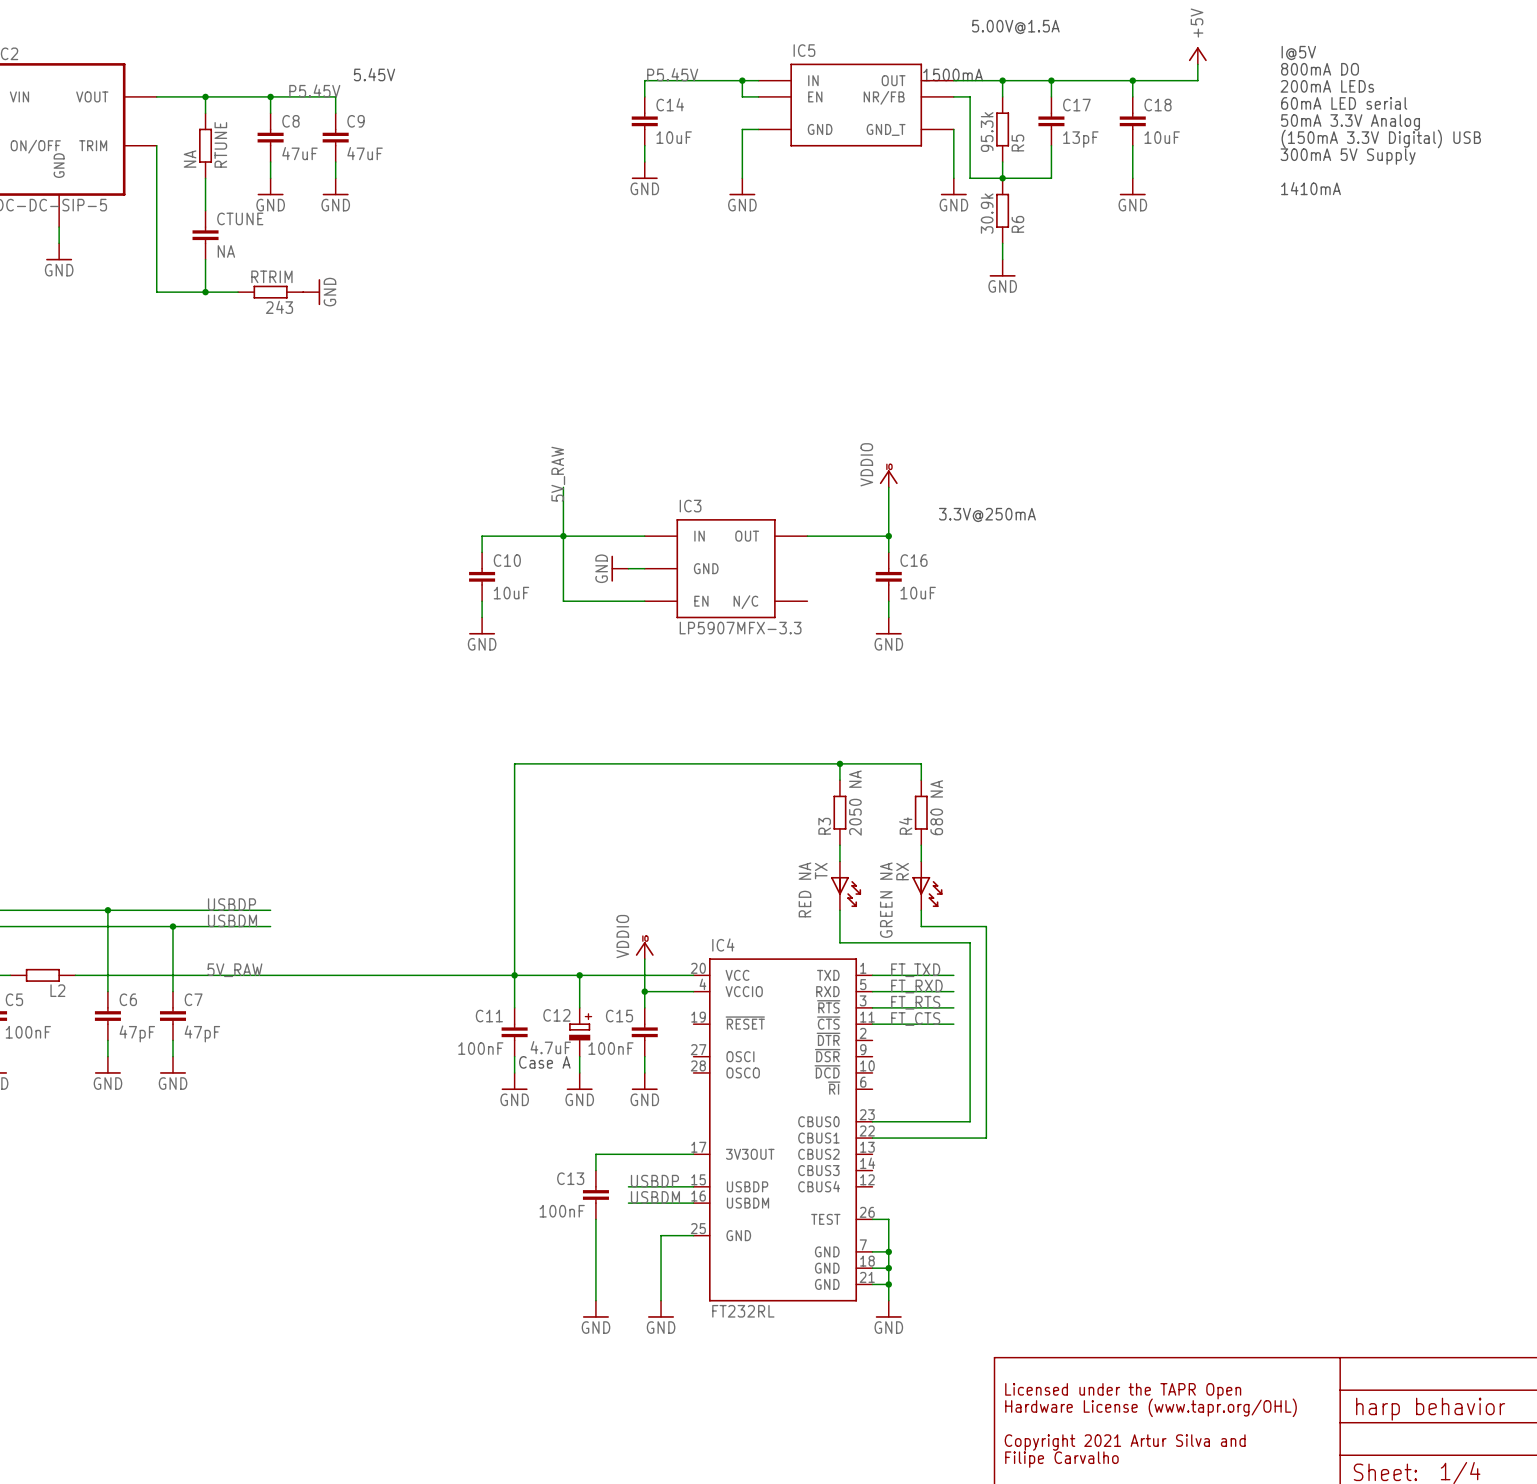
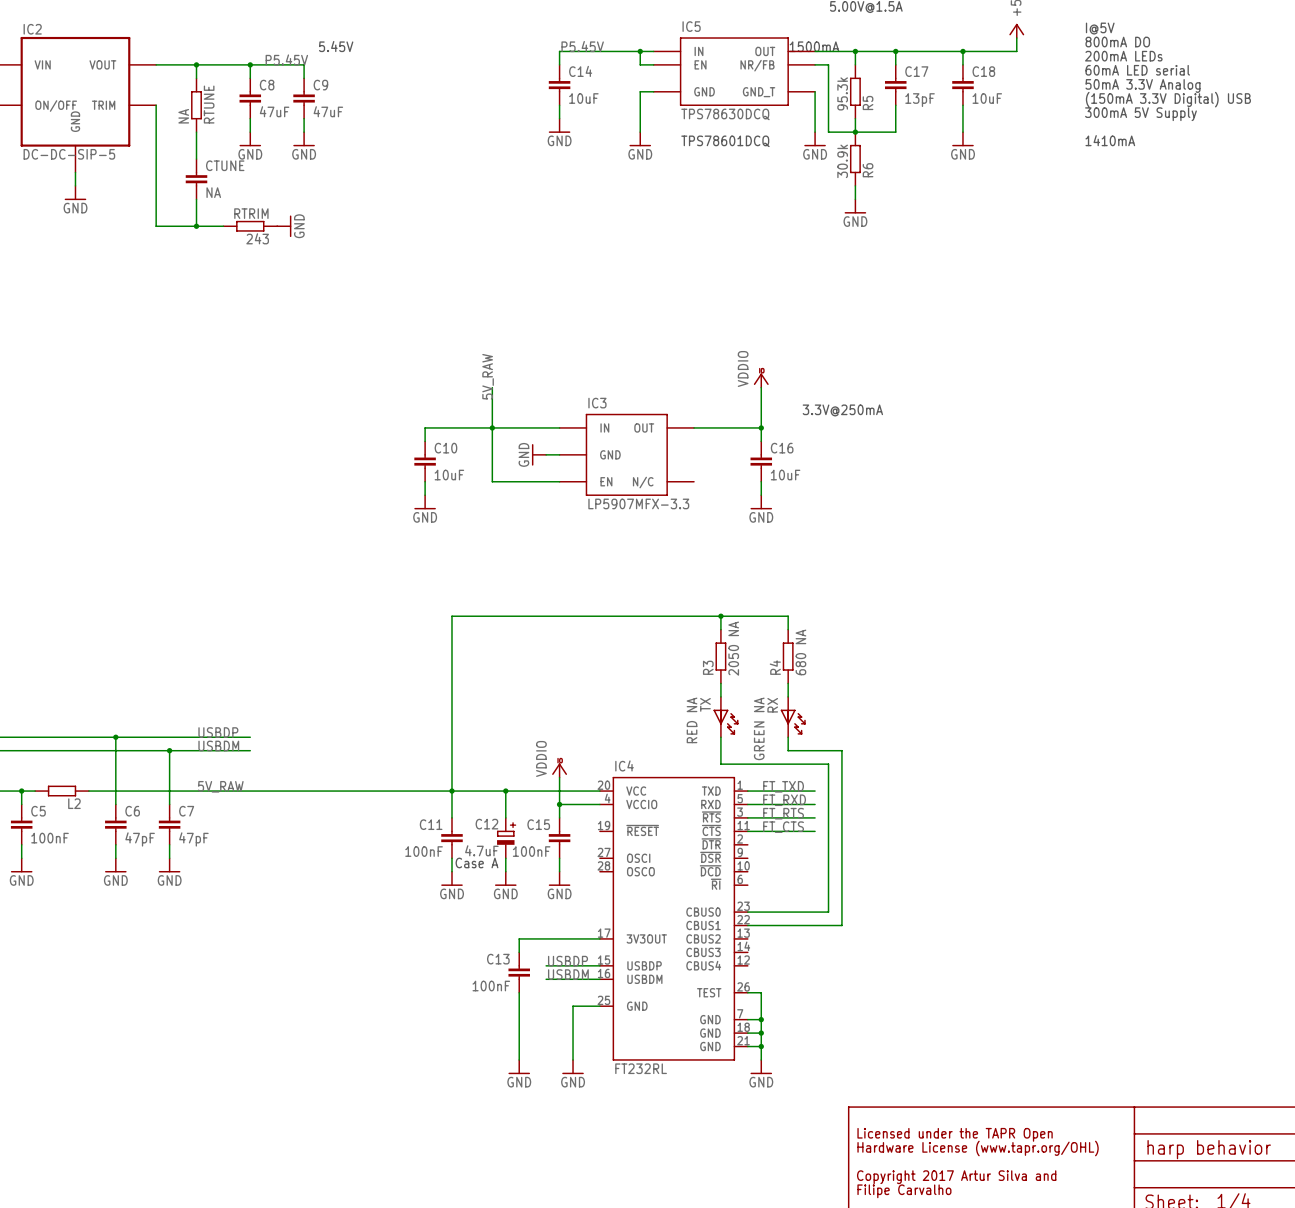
IC5 value: none -> TPS78630DCQ (725, 114)
text: none -> TPS78601DCQ (725, 141)
text: Copyright 2021 Artur Silva and (1125, 1442) -> Copyright 2017 Artur Silva and (956, 1177)

